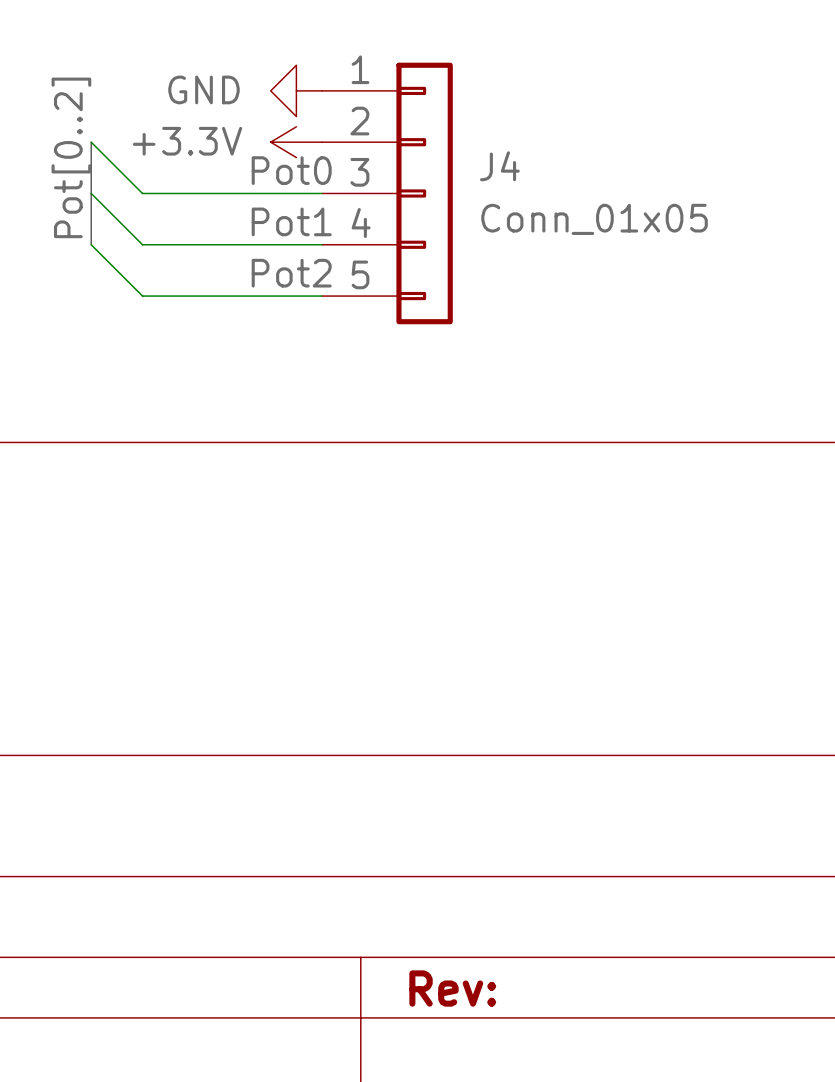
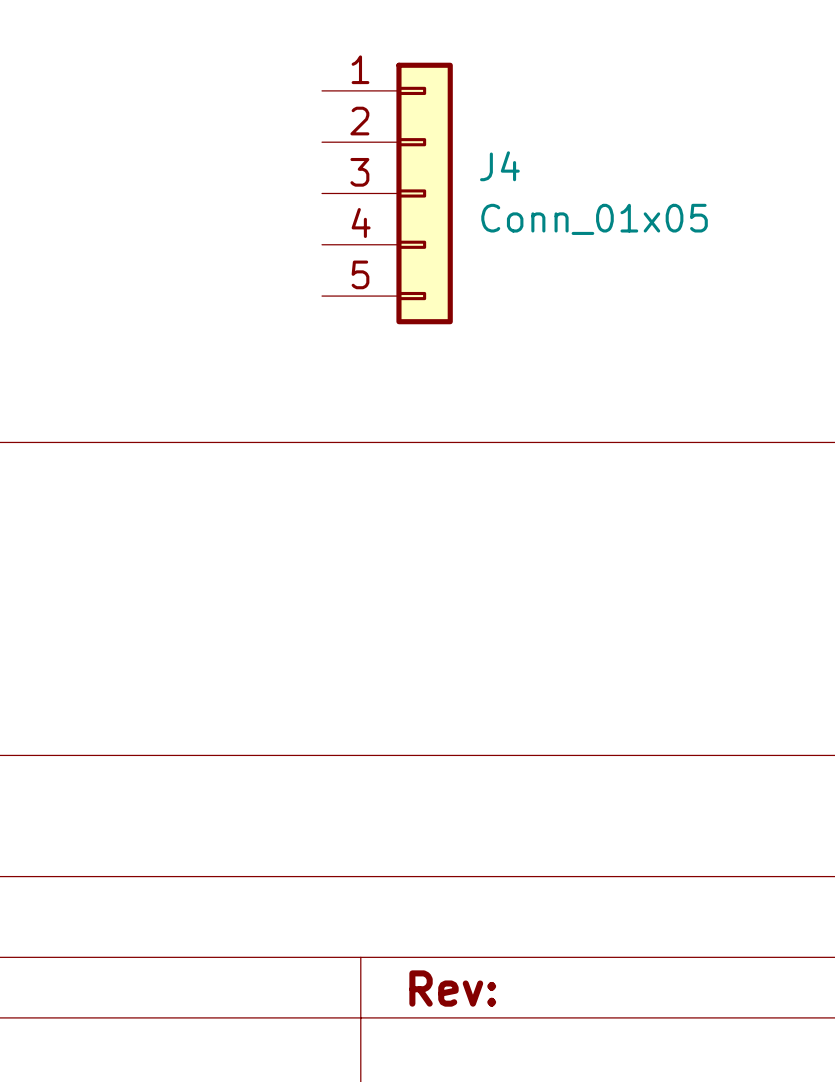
power symbol: GND (296, 90) -> none
wire: (91, 142) (142, 193) (322, 193) -> none
bus: (91, 142) (91, 244) -> none
power symbol: +3.3V (296, 142) -> none
label: Pot[0..2] (71, 157) -> none
label: Pot0 (291, 170) -> none
wire: (91, 193) (142, 244) (322, 244) -> none
label: Pot1 (291, 221) -> none
wire: (91, 244) (142, 296) (322, 296) -> none
label: Pot2 (291, 273) -> none

